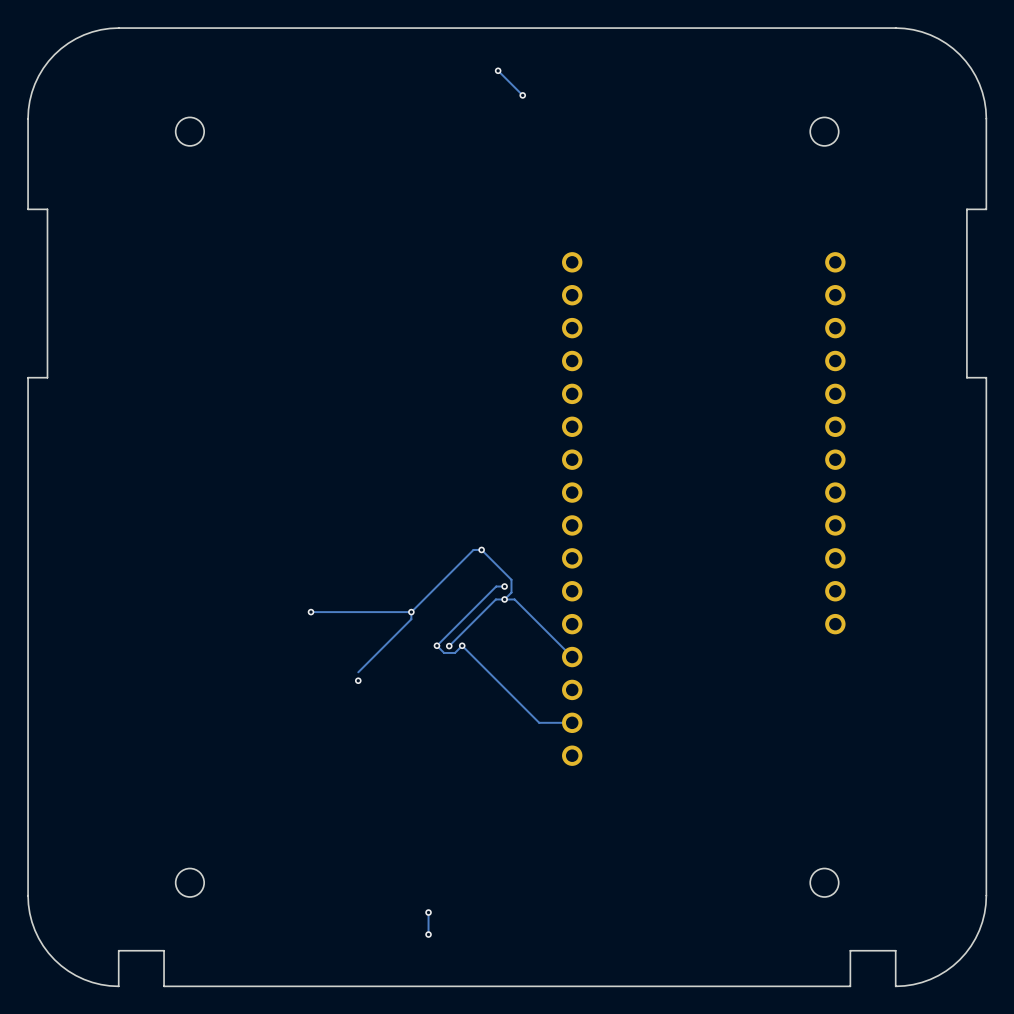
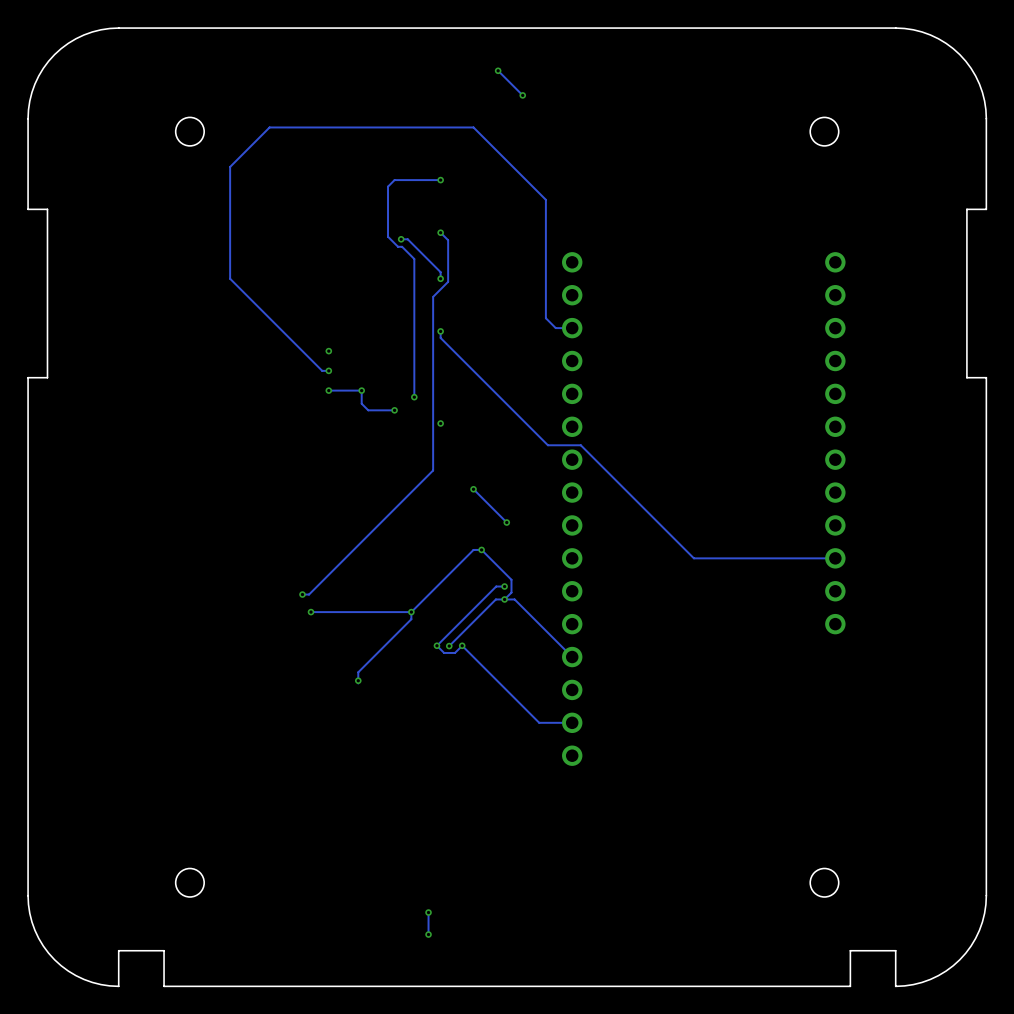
track: none -> (440, 180) (394, 180) (388, 186) (388, 236) (414, 259) (414, 397)
via: none -> (440, 180)
track: none -> (440, 232) (448, 240) (448, 281) (433, 296) (433, 470) (309, 594) (302, 594)
via: none -> (440, 232)
track: none -> (401, 239) (407, 239) (440, 272) (440, 278)
via: none -> (401, 239)
via: none -> (440, 278)
track: none -> (572, 328) (555, 328) (545, 318) (545, 199) (473, 127) (269, 127) (230, 166) (230, 278) (322, 370) (328, 370)
track: none -> (440, 331) (440, 337) (547, 445) (580, 445) (693, 558) (835, 558) (835, 555)
via: none -> (440, 331)
via: none -> (328, 351)
via: none -> (328, 370)
track: none -> (328, 390) (361, 390) (361, 403) (368, 410) (394, 410)
via: none -> (328, 390)
via: none -> (361, 390)
via: none -> (414, 397)
via: none -> (394, 410)
via: none -> (440, 423)
track: none -> (473, 489) (506, 522)
via: none -> (473, 489)
via: none -> (506, 522)
via: none -> (302, 594)
track: none -> (358, 672) (358, 683)

